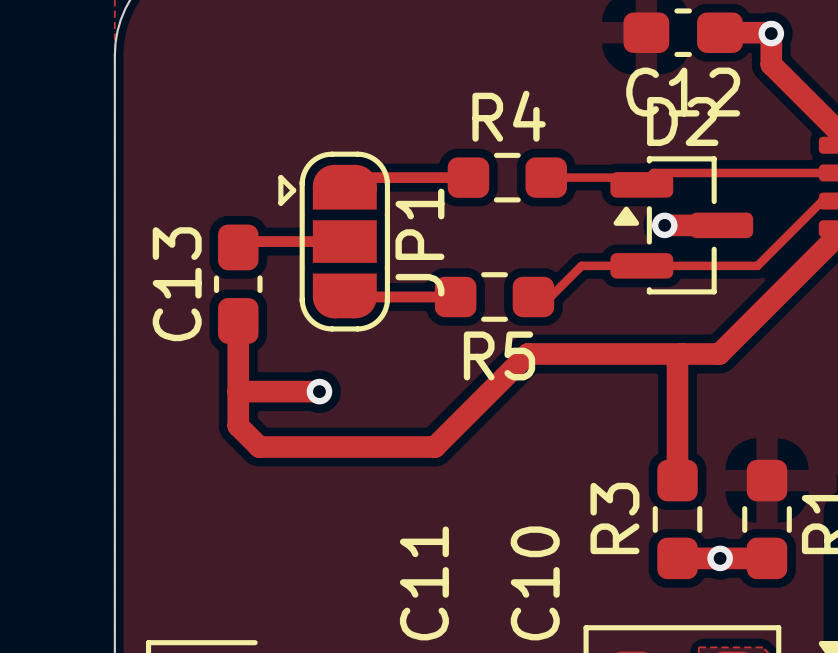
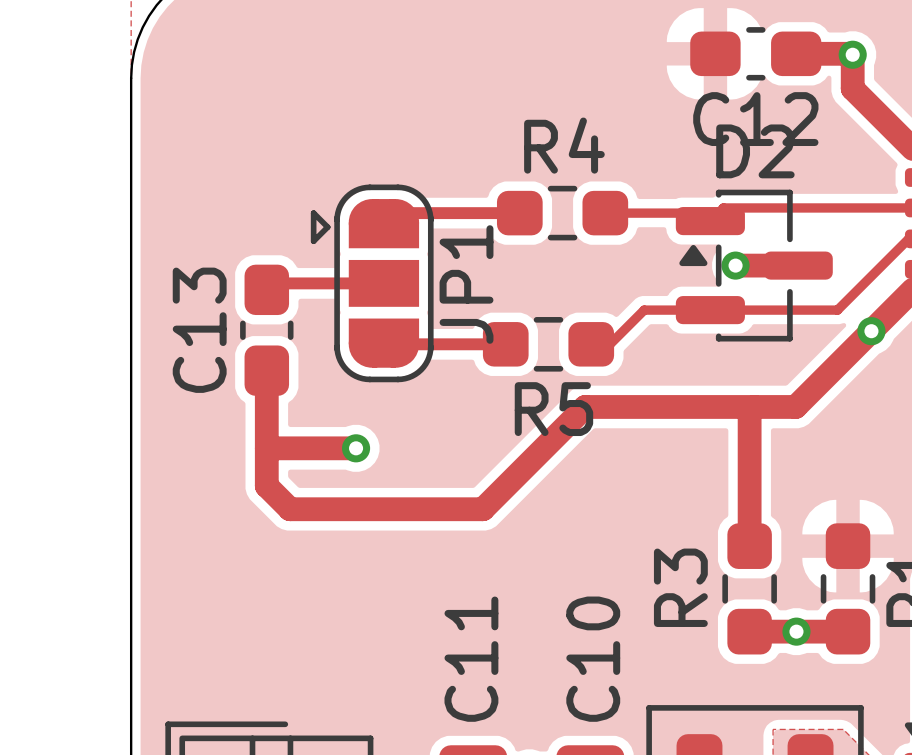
via: none -> (871, 331)

